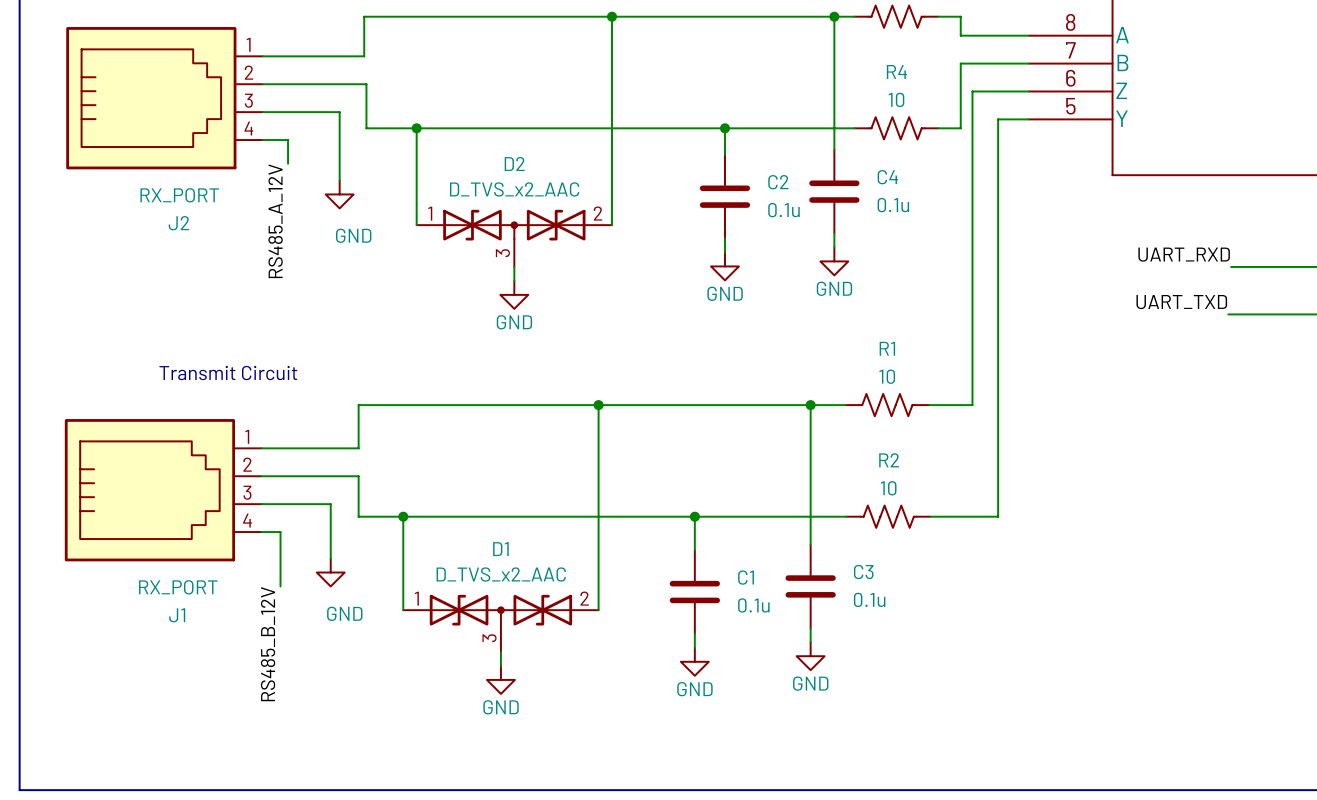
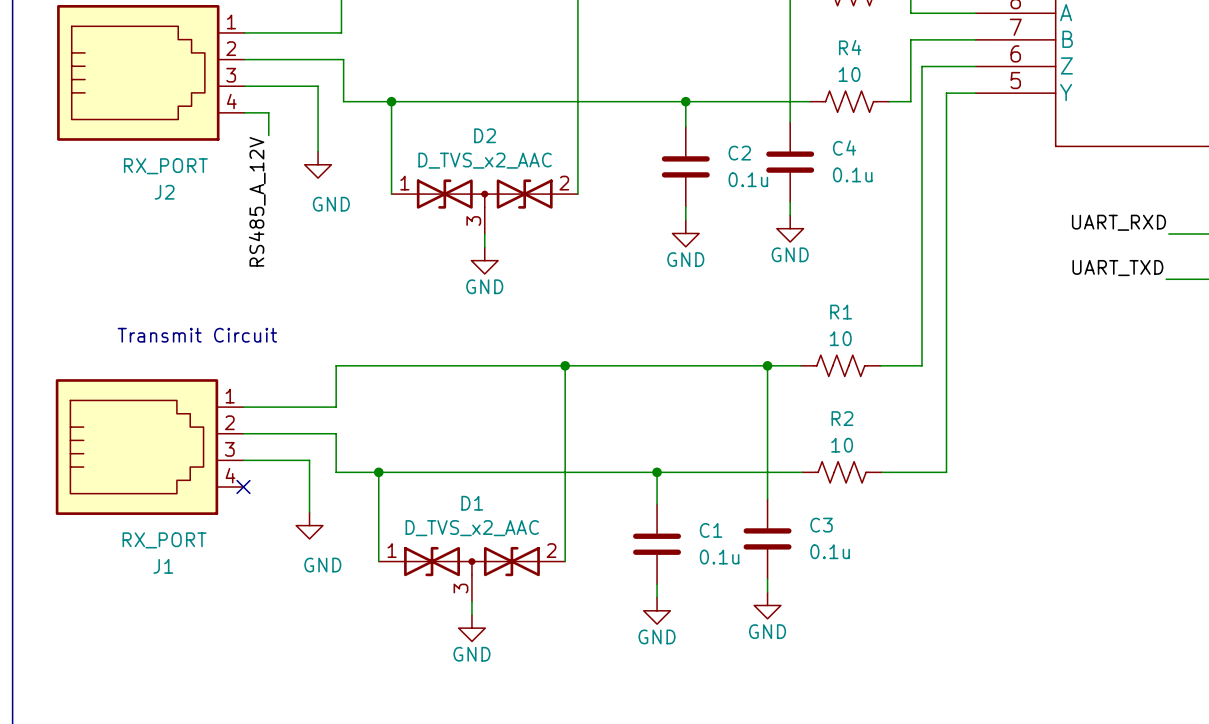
wire: (261, 532) (280, 532) (280, 586) -> none
no-connect mark: none -> (243, 486)
label: RS485_B_12V (268, 644) -> none

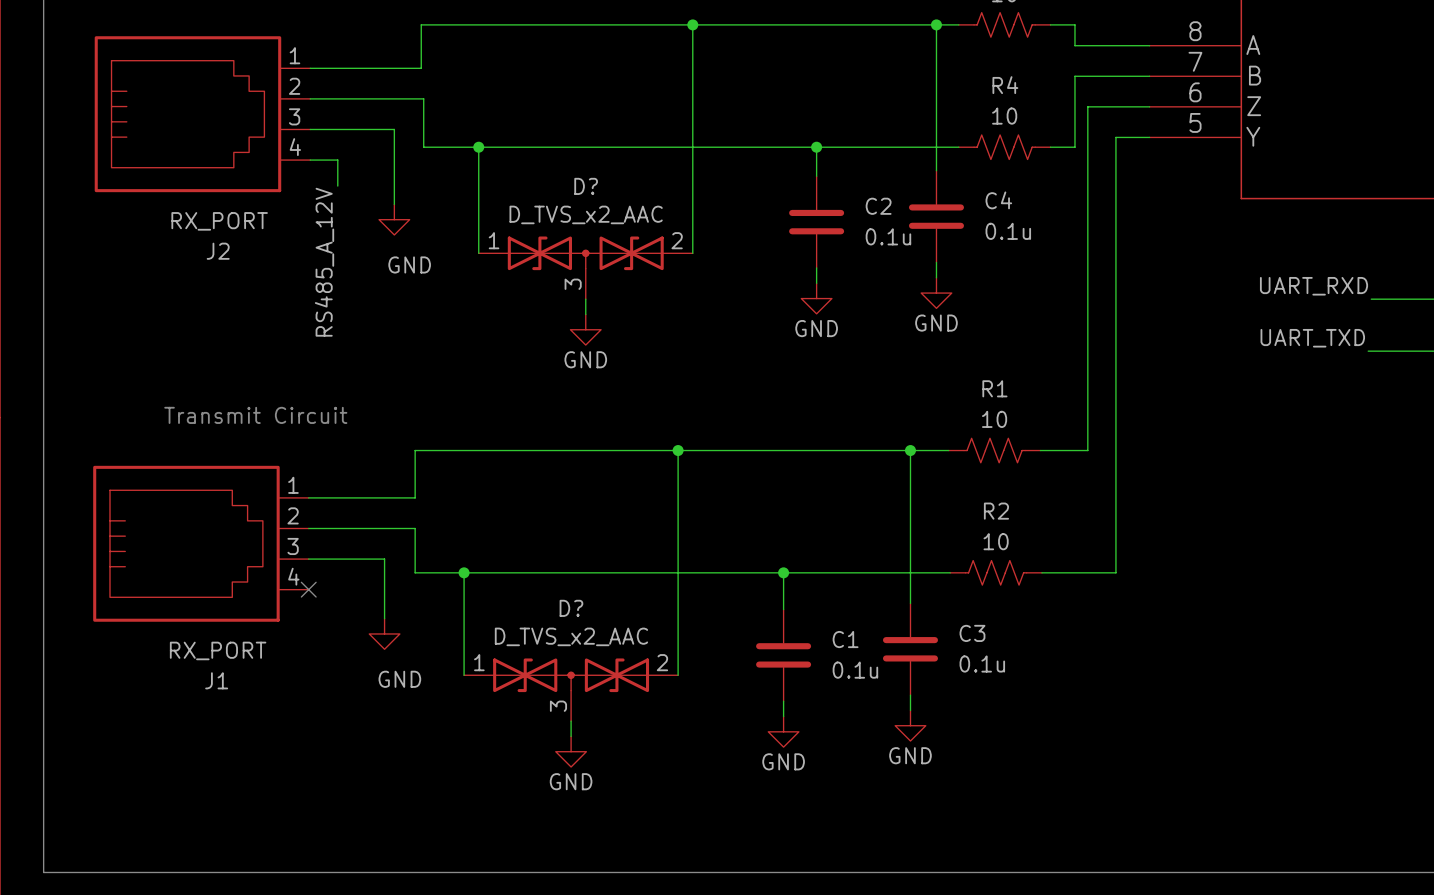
D2 name: D2 (485, 135) -> D? (586, 186)
D1 name: D1 (472, 503) -> D? (571, 608)

